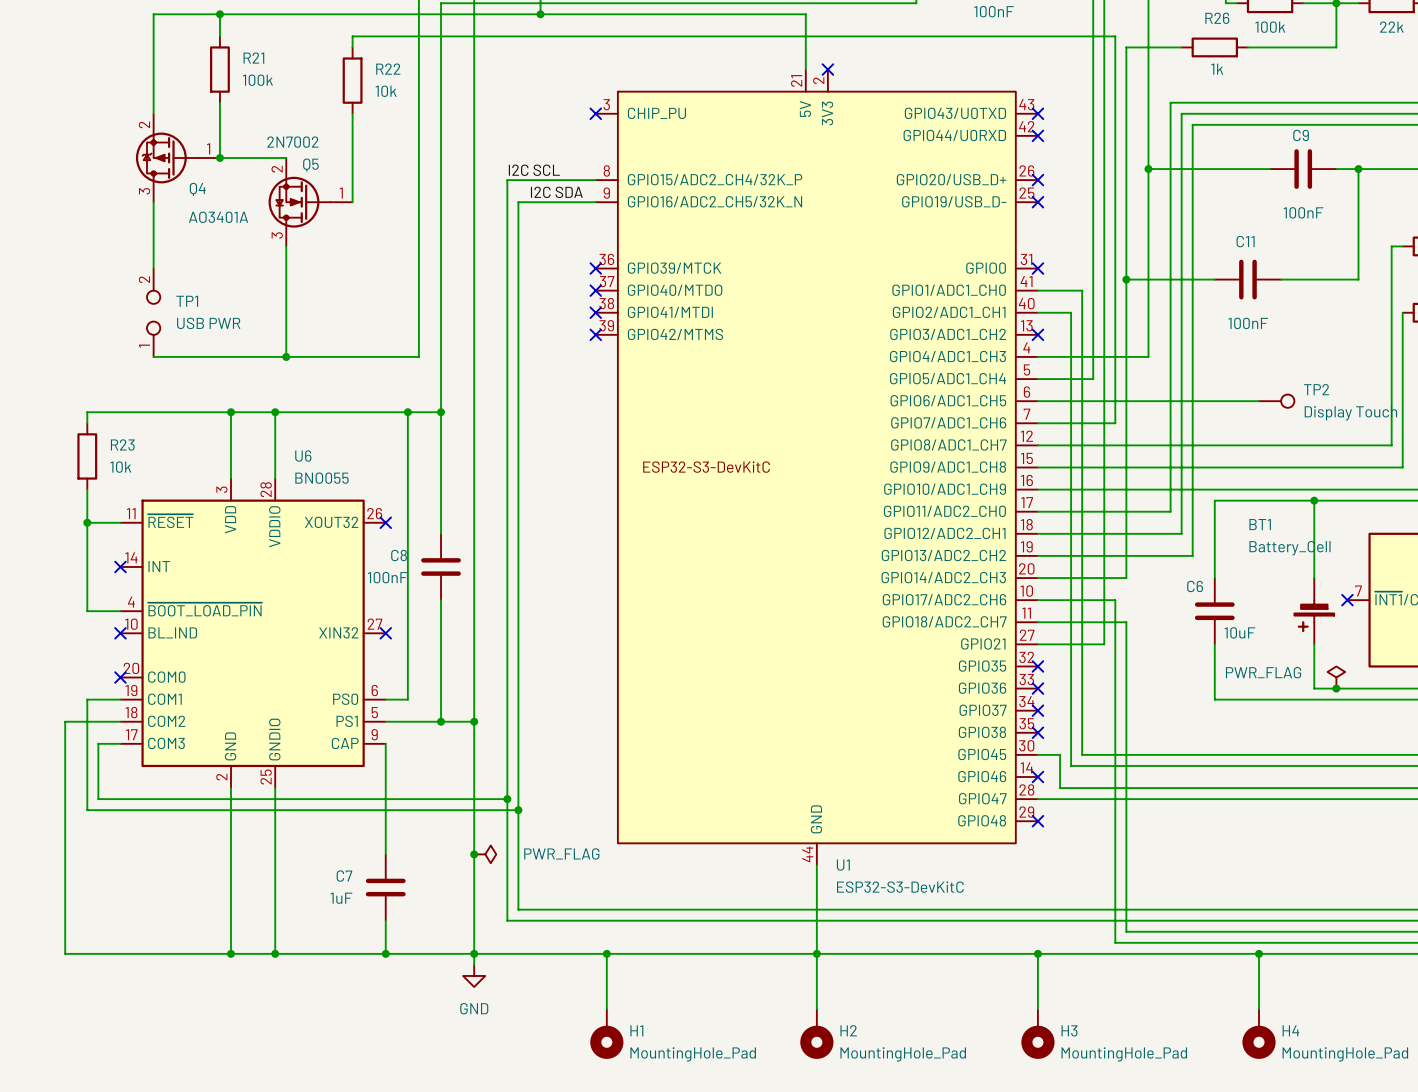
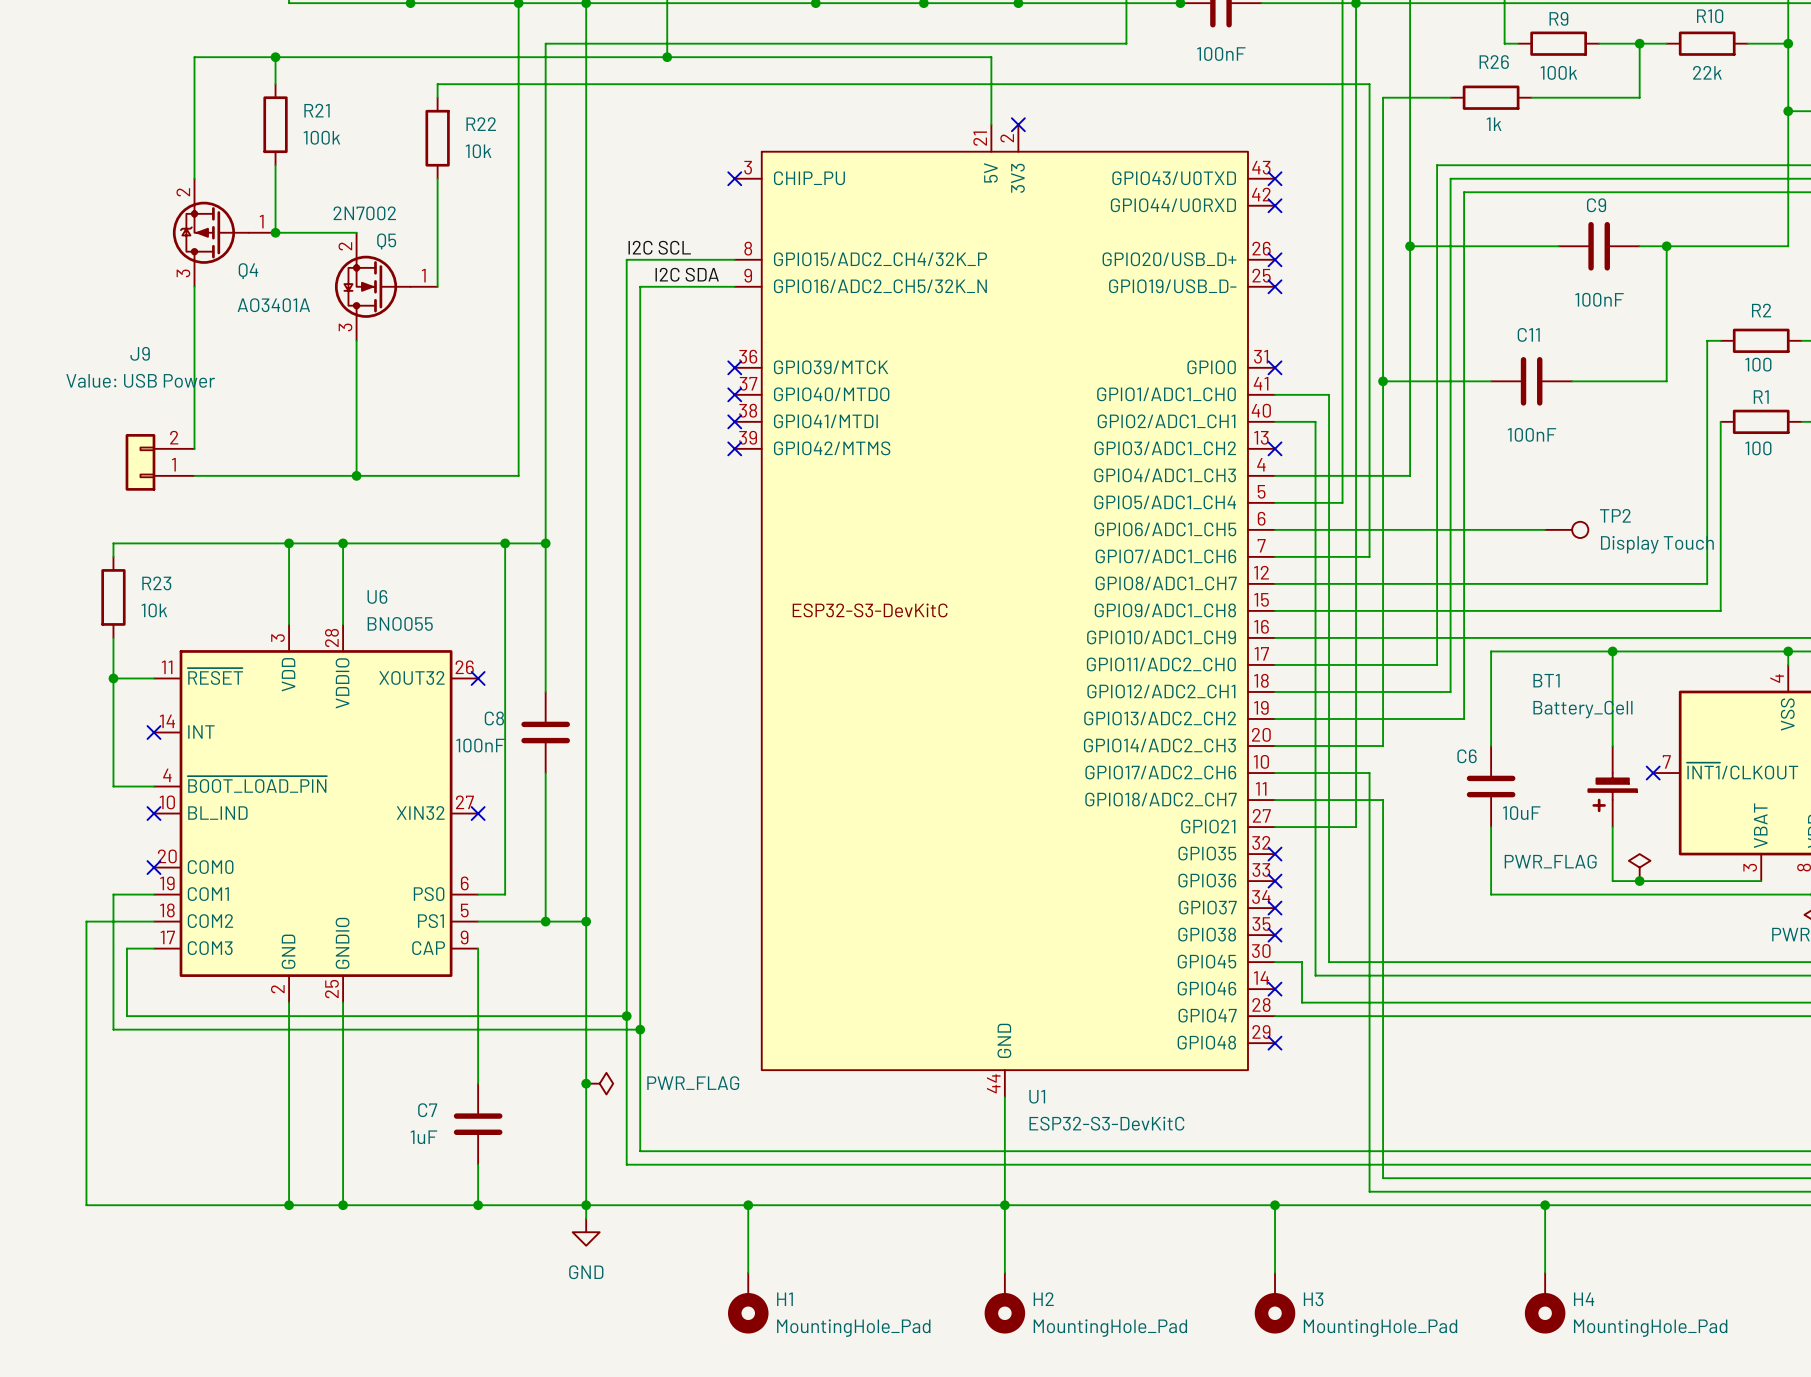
wire: none -> (194, 367) (194, 448)
TP1: USB PWR (153, 312) -> none
J9: none -> Value: USB Power (160, 462)

